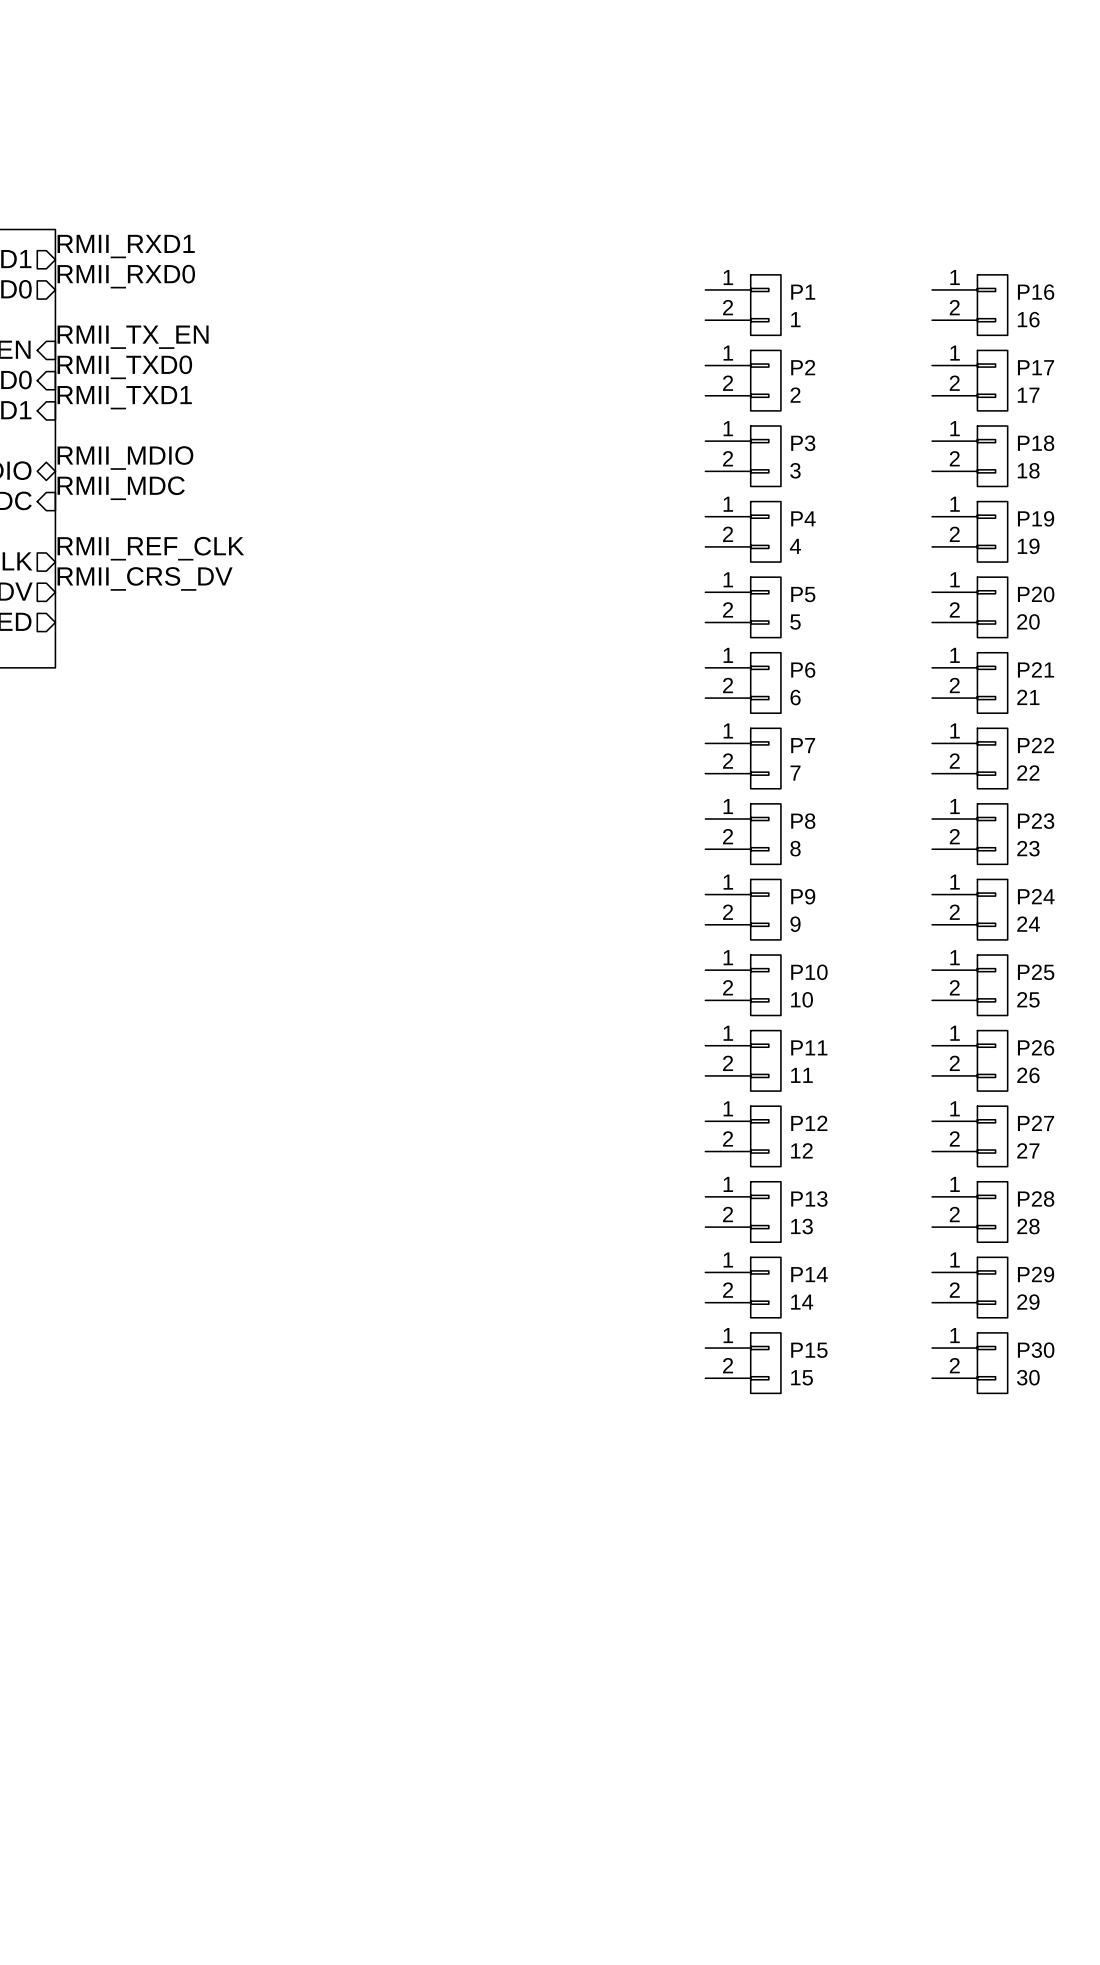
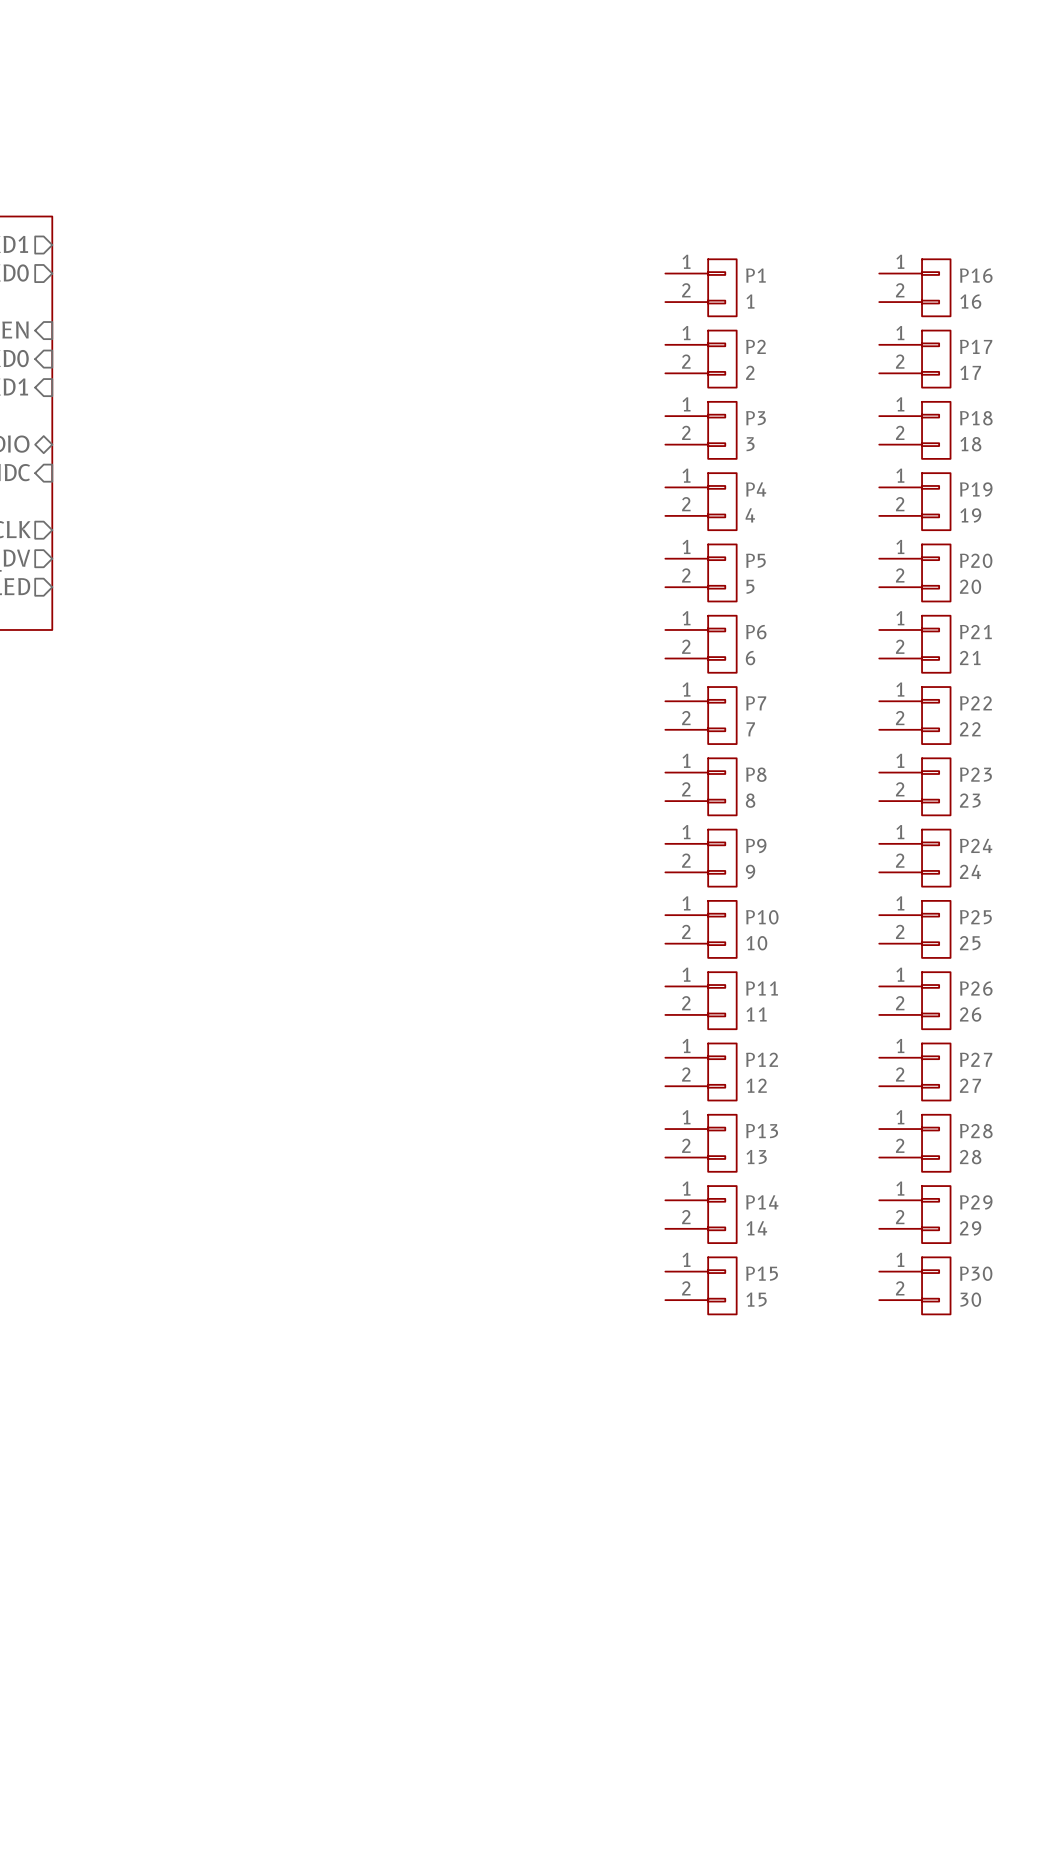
label: RMII_RXD1 (126, 246) -> none
label: RMII_RXD0 (126, 276) -> none
label: RMII_TX_EN (133, 337) -> none
label: RMII_TXD0 (124, 367) -> none
label: RMII_TXD1 (124, 397) -> none
label: RMII_MDIO (125, 458) -> none
label: RMII_MDC (121, 488) -> none
label: RMII_REF_CLK (150, 548) -> none
label: RMII_CRS_DV (145, 578) -> none

